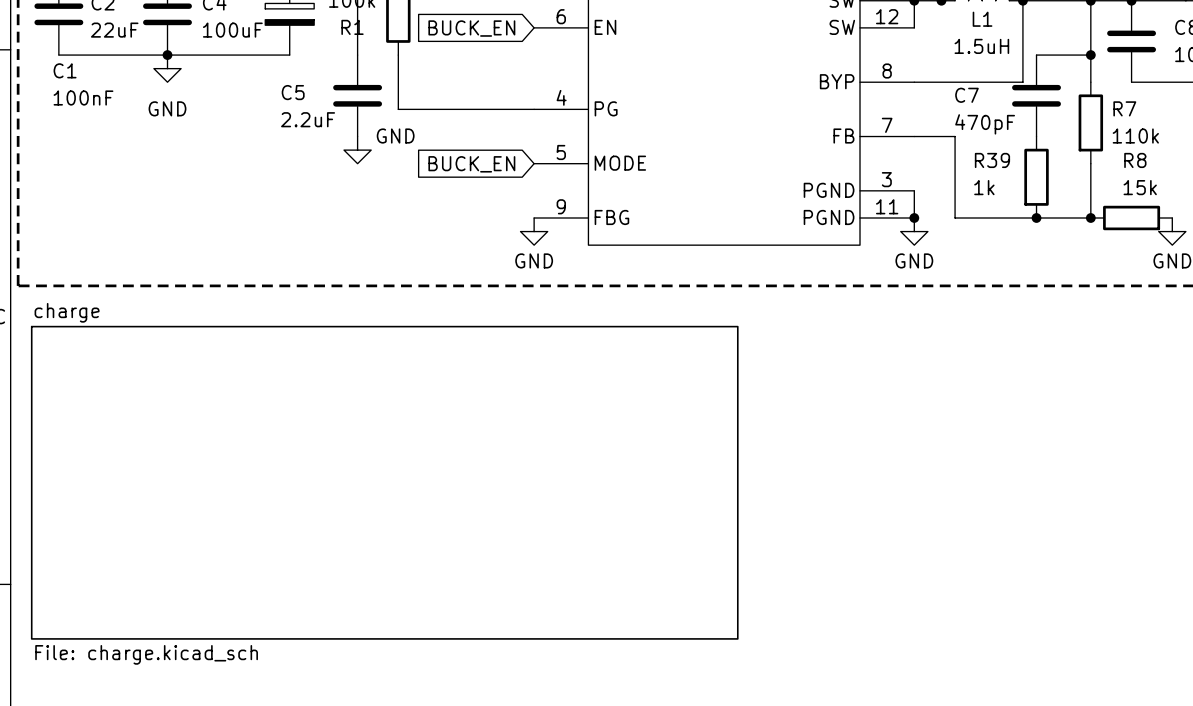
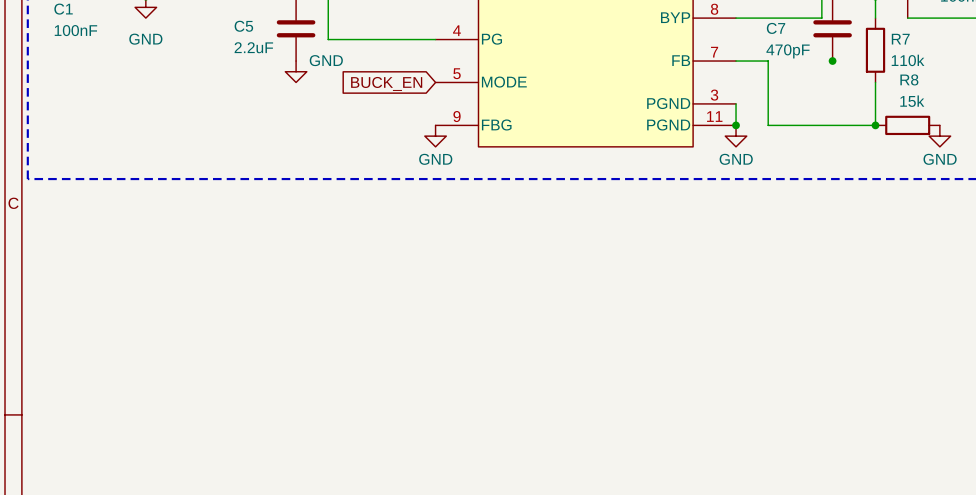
junction: none -> (832, 61)
R39: 1k (1036, 177) -> none
junction: (1036, 217) -> none
sheet charge: File: charge.kicad_sch (384, 482) -> none

